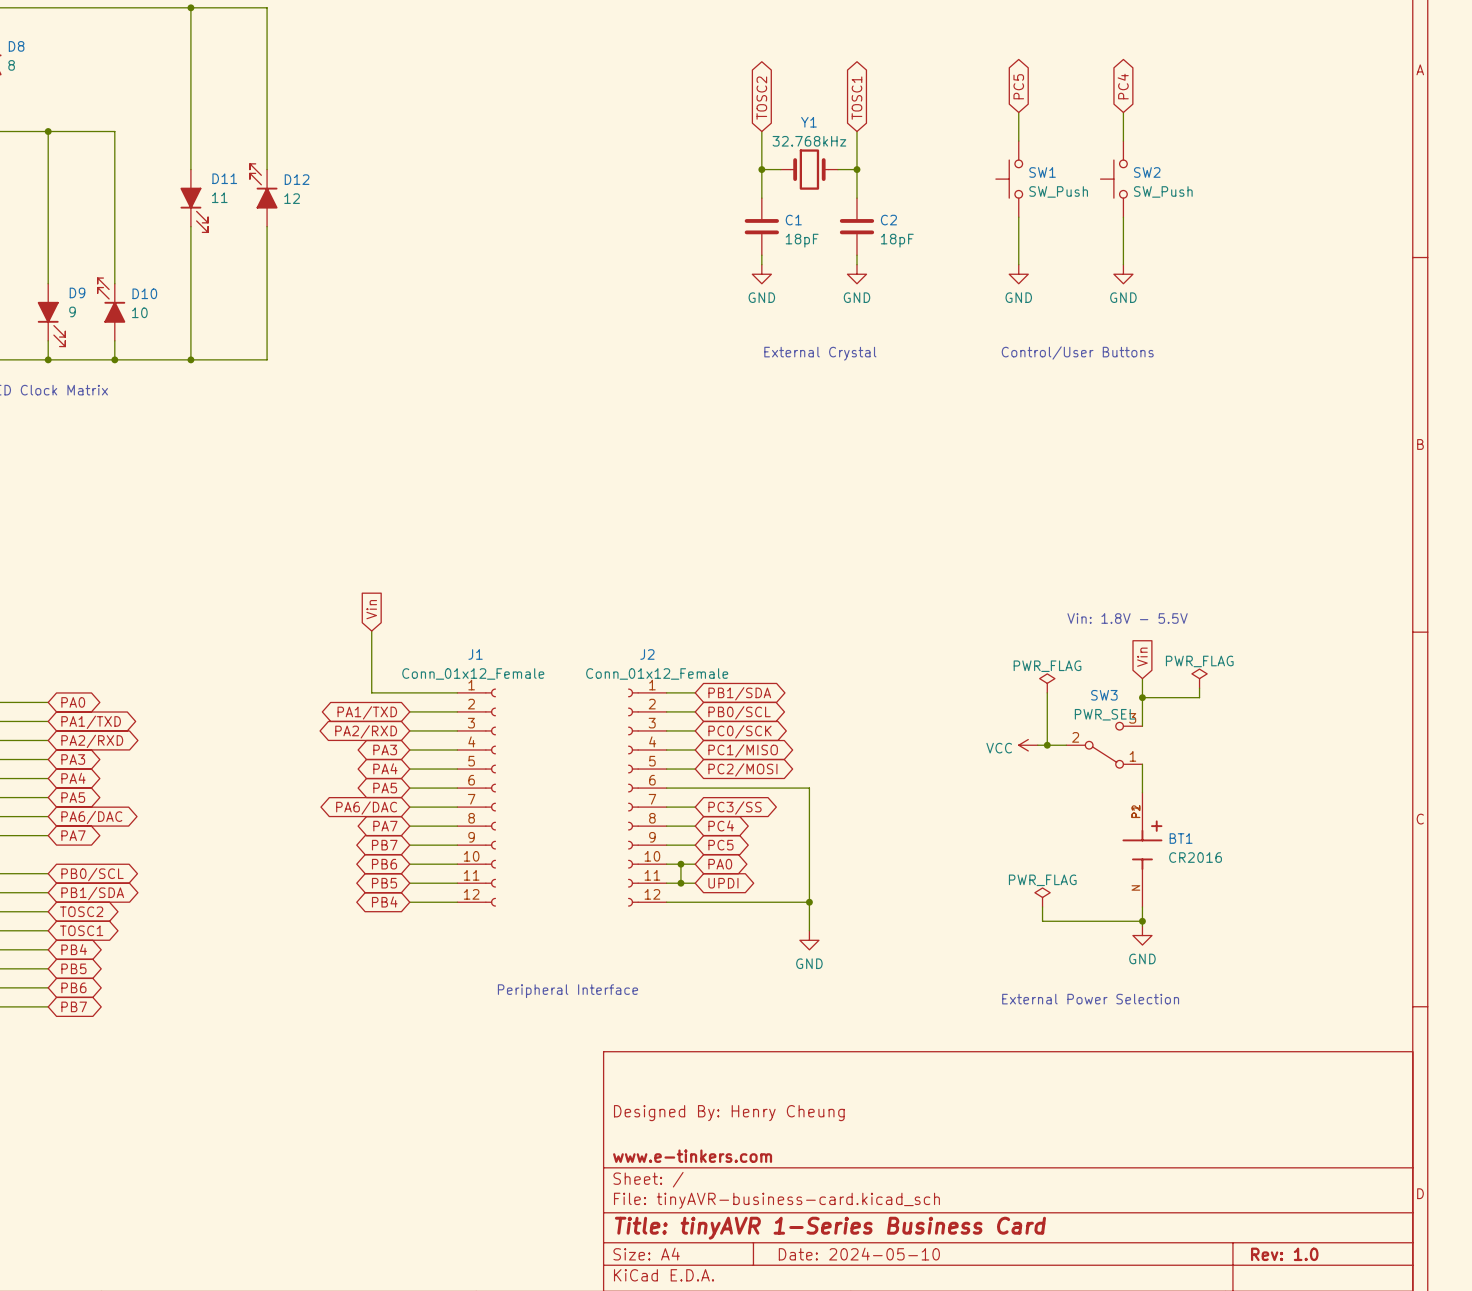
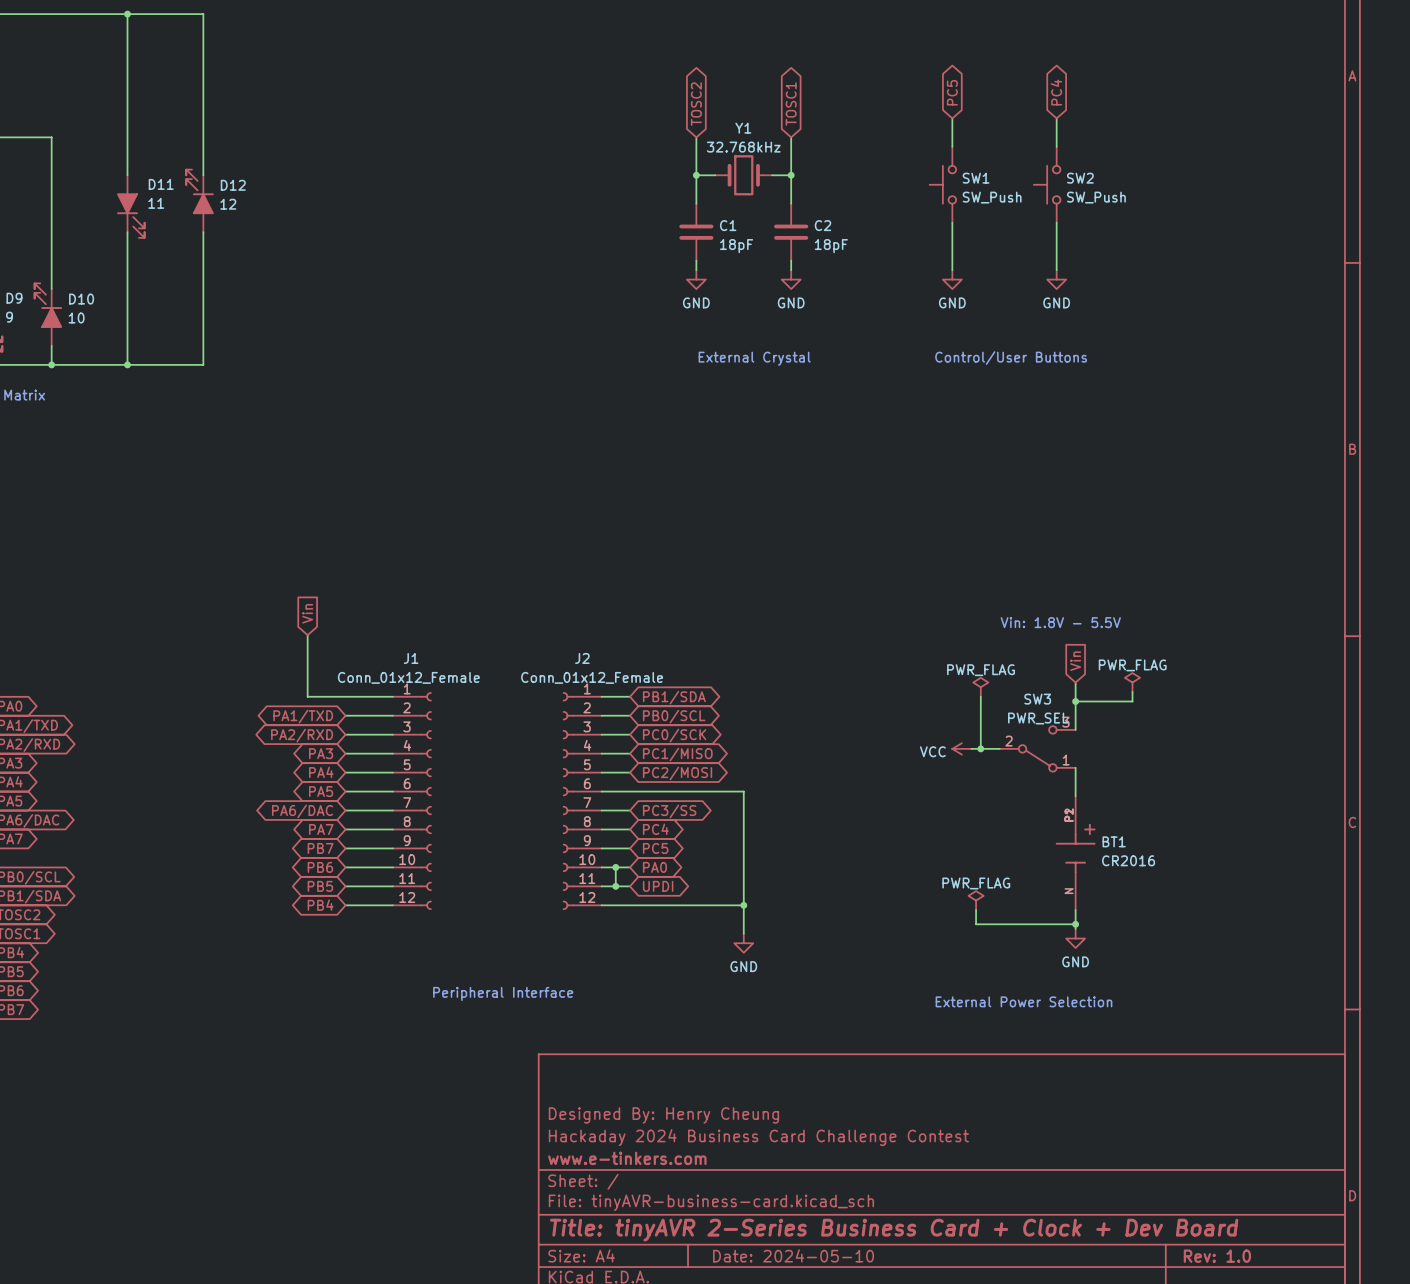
title block: none -> Hackaday 2024 Business Card Challenge Contest (758, 1137)
title block: Title: tinyAVR 1-Series Business Card (830, 1228) -> Title: tinyAVR 2-Series Business Card + Clock + Dev Board (894, 1230)

